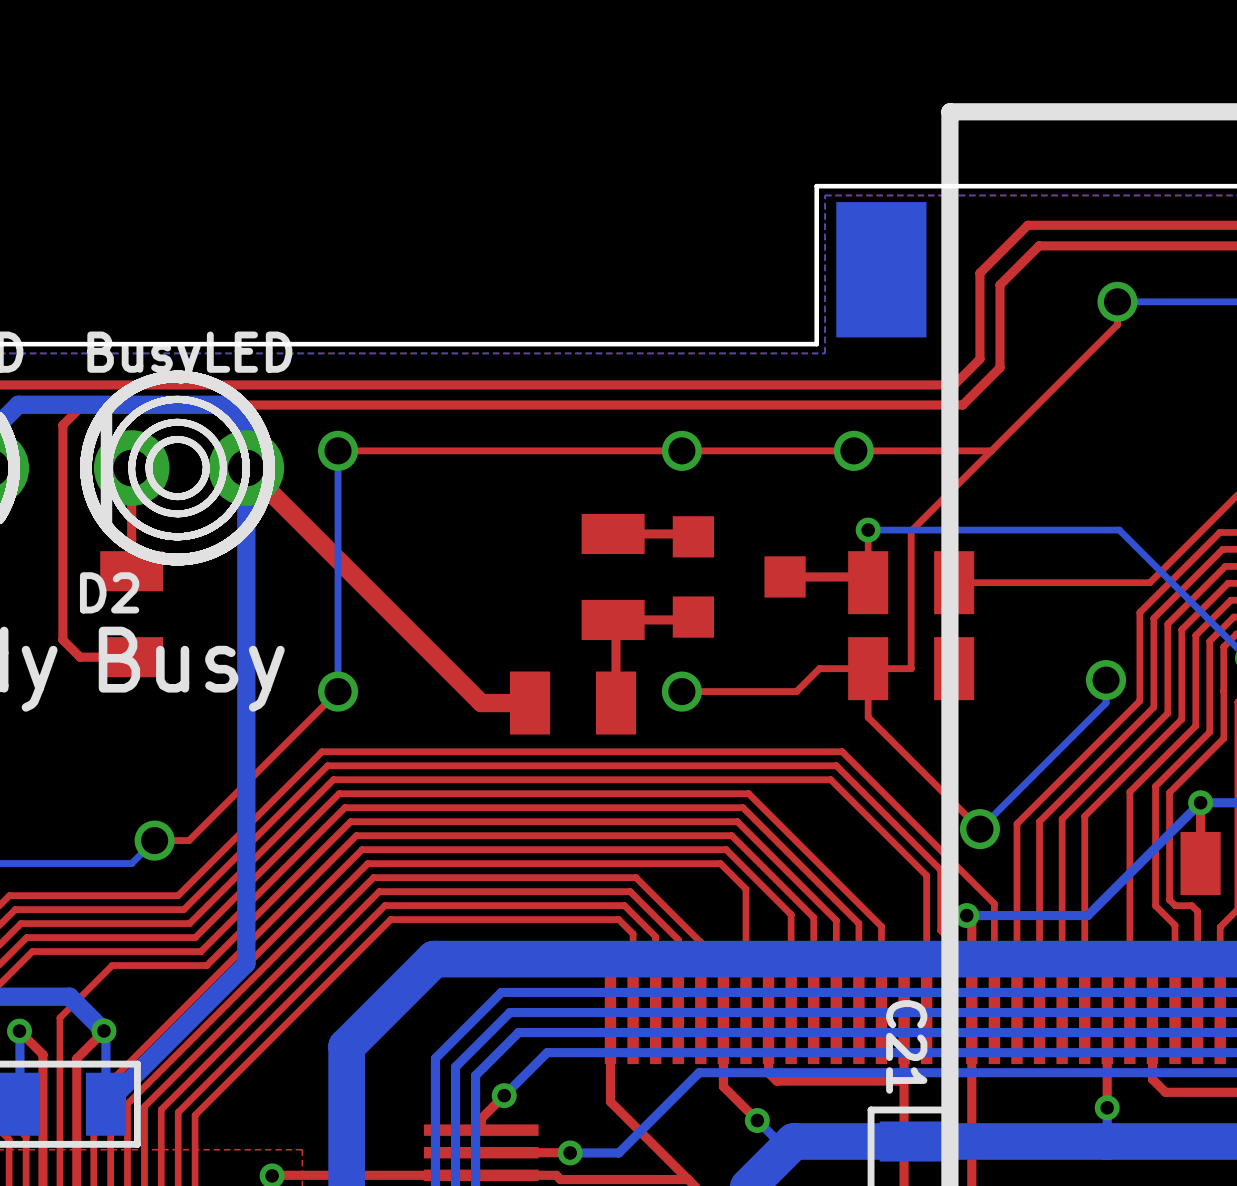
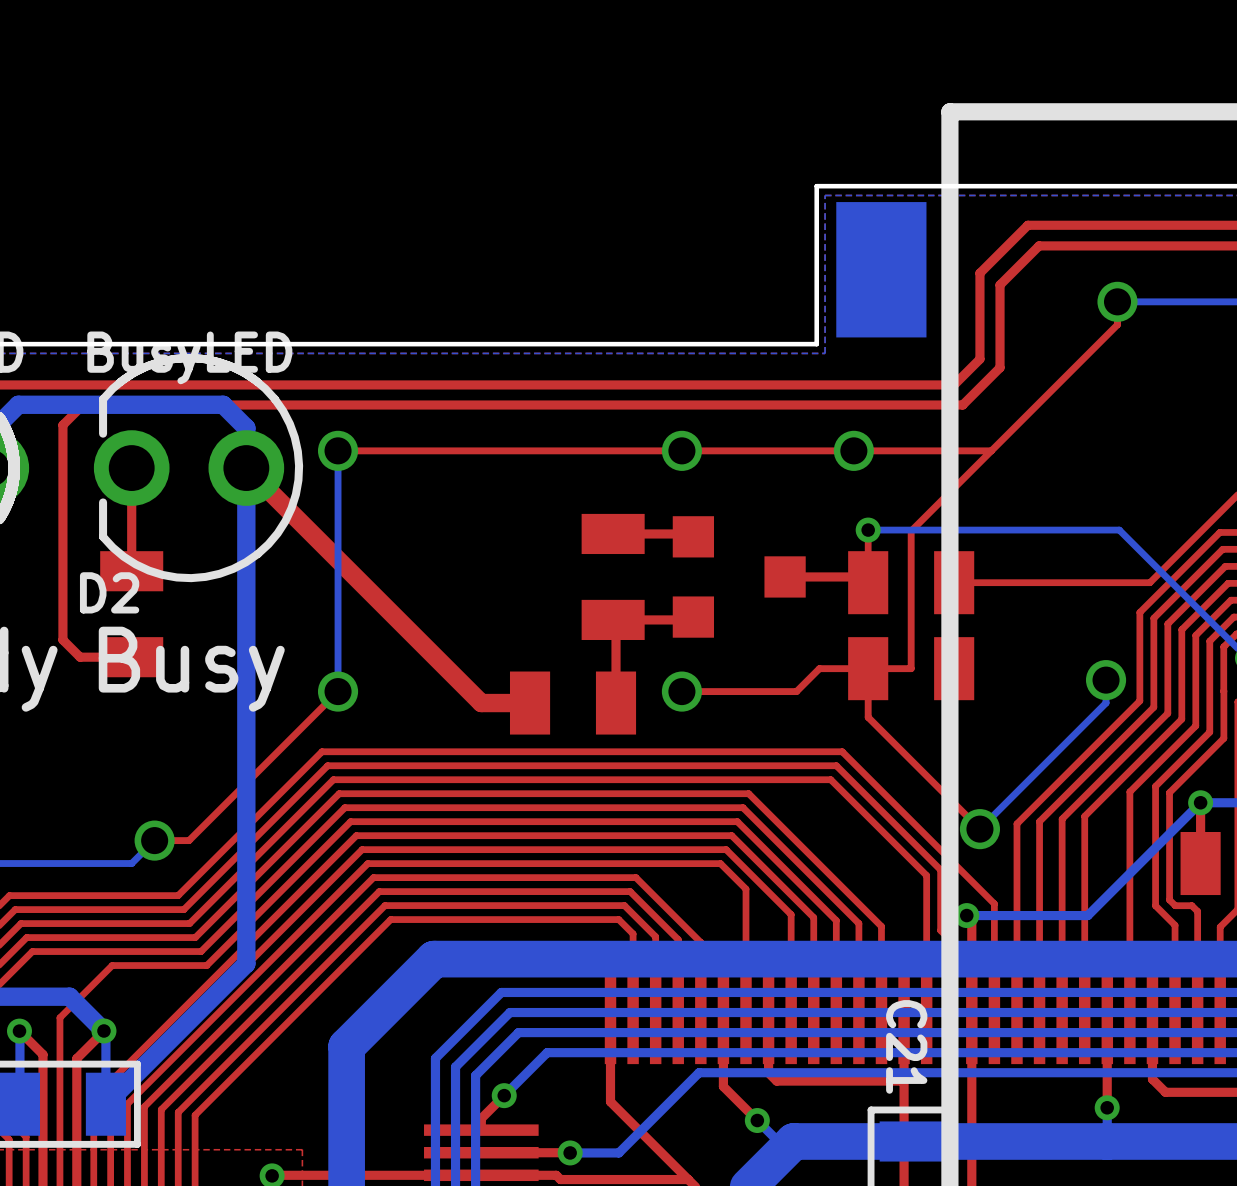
D2 footprint: [80, 370, 285, 566] -> [93, 353, 304, 583]

